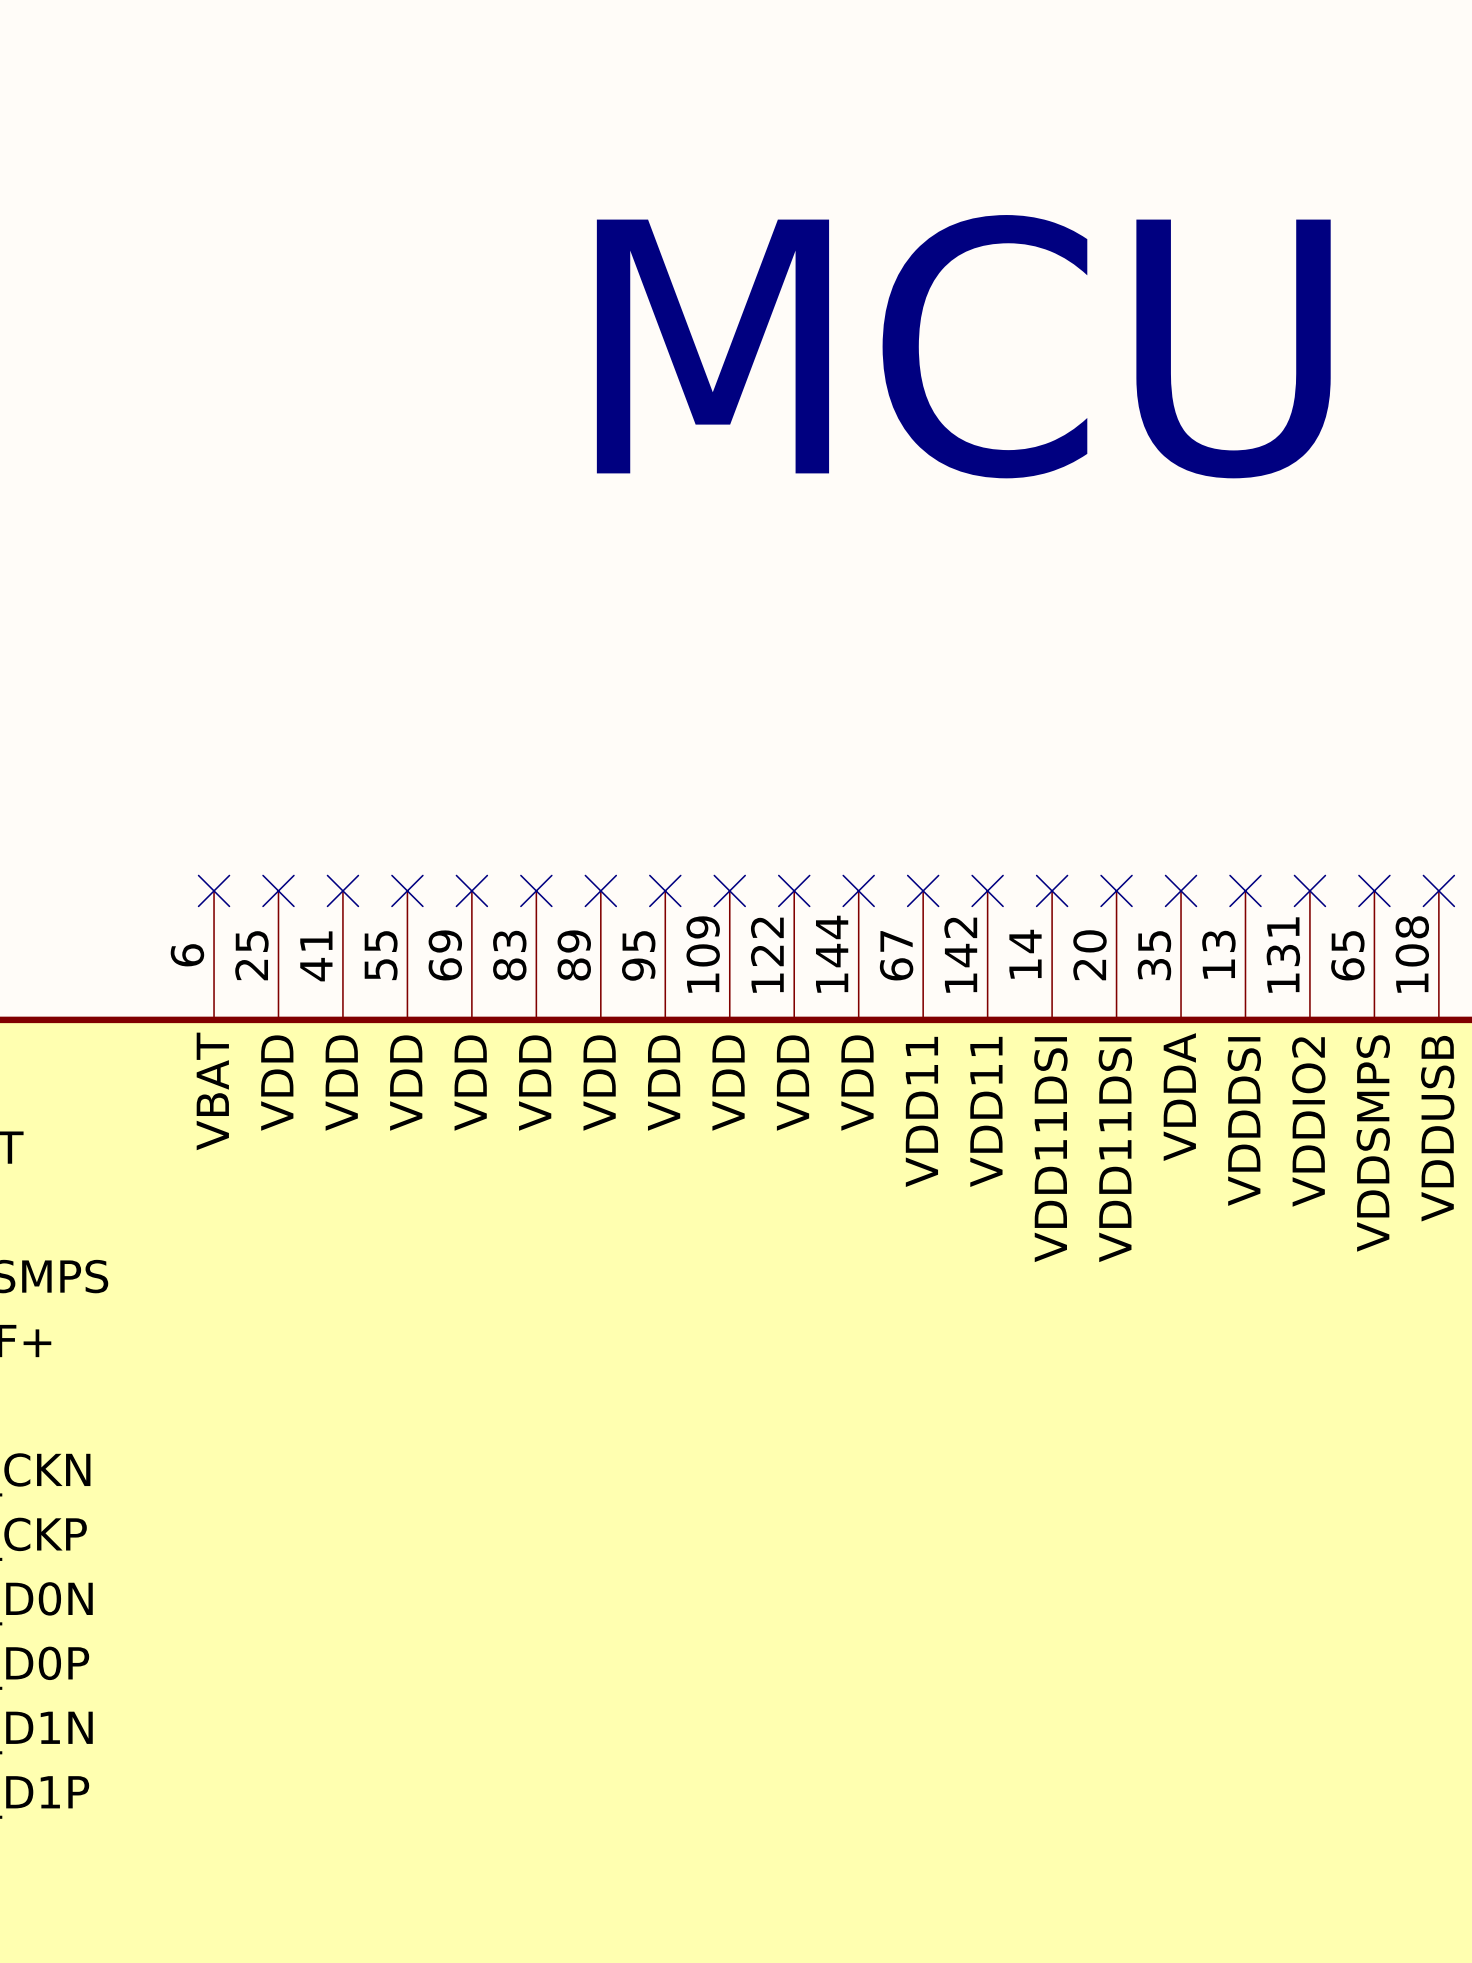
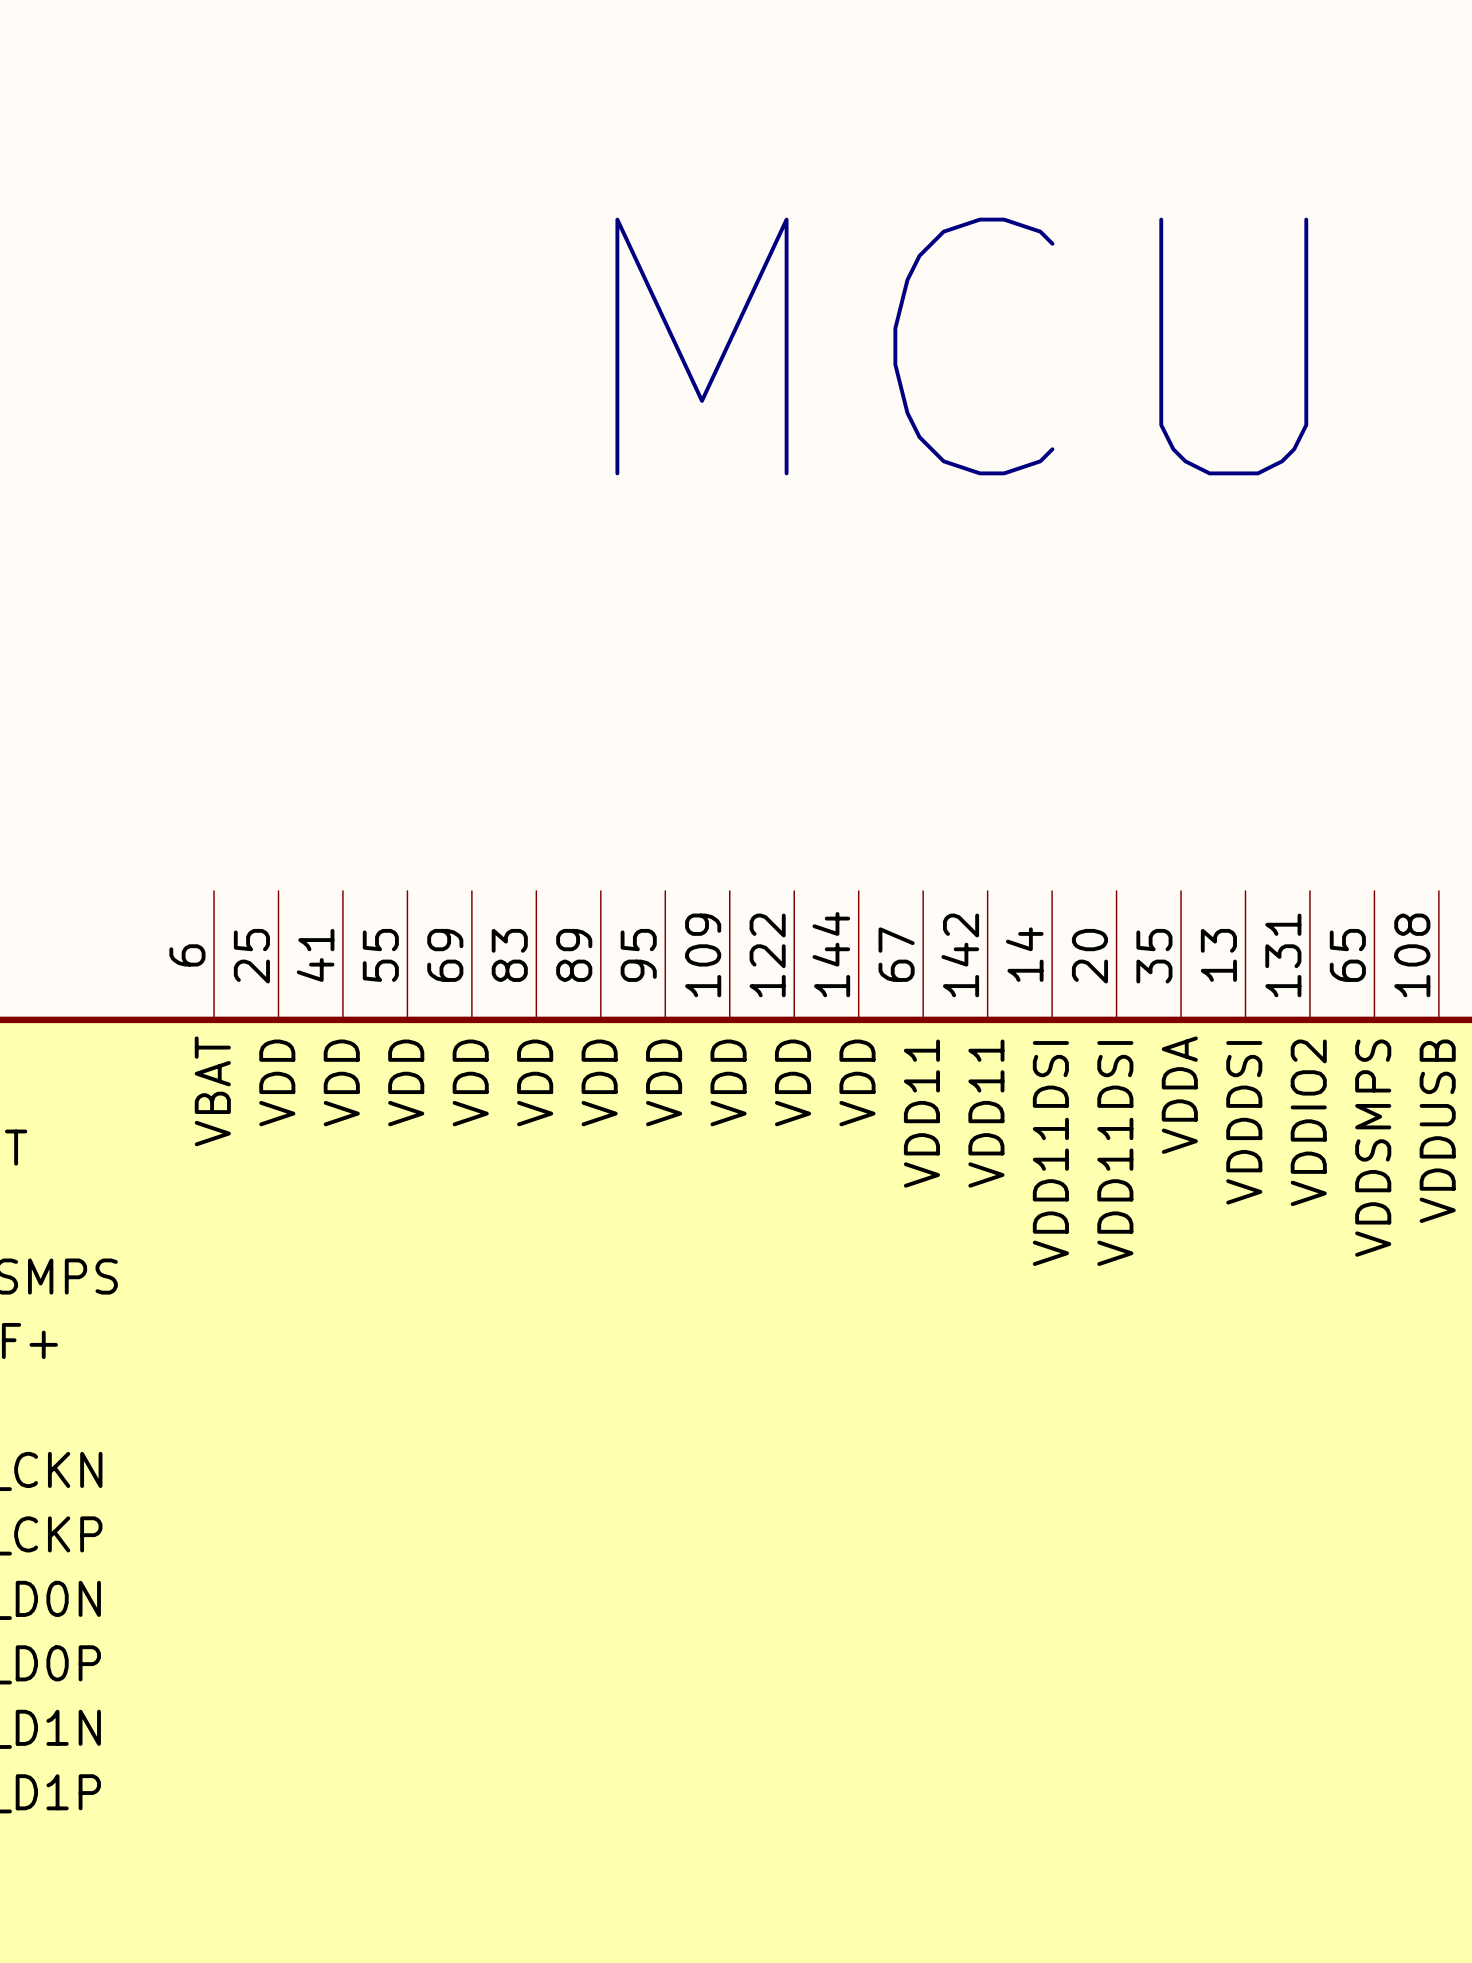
no-connect mark: (214, 890) -> none
no-connect mark: (278, 890) -> none
no-connect mark: (342, 890) -> none
no-connect mark: (407, 890) -> none
no-connect mark: (471, 890) -> none
no-connect mark: (536, 890) -> none
no-connect mark: (600, 890) -> none
no-connect mark: (665, 890) -> none
no-connect mark: (729, 890) -> none
no-connect mark: (794, 890) -> none
no-connect mark: (858, 890) -> none
no-connect mark: (923, 890) -> none
no-connect mark: (987, 890) -> none
no-connect mark: (1052, 890) -> none
no-connect mark: (1116, 890) -> none
no-connect mark: (1181, 890) -> none
no-connect mark: (1245, 890) -> none
no-connect mark: (1309, 890) -> none
no-connect mark: (1374, 890) -> none
no-connect mark: (1438, 890) -> none

